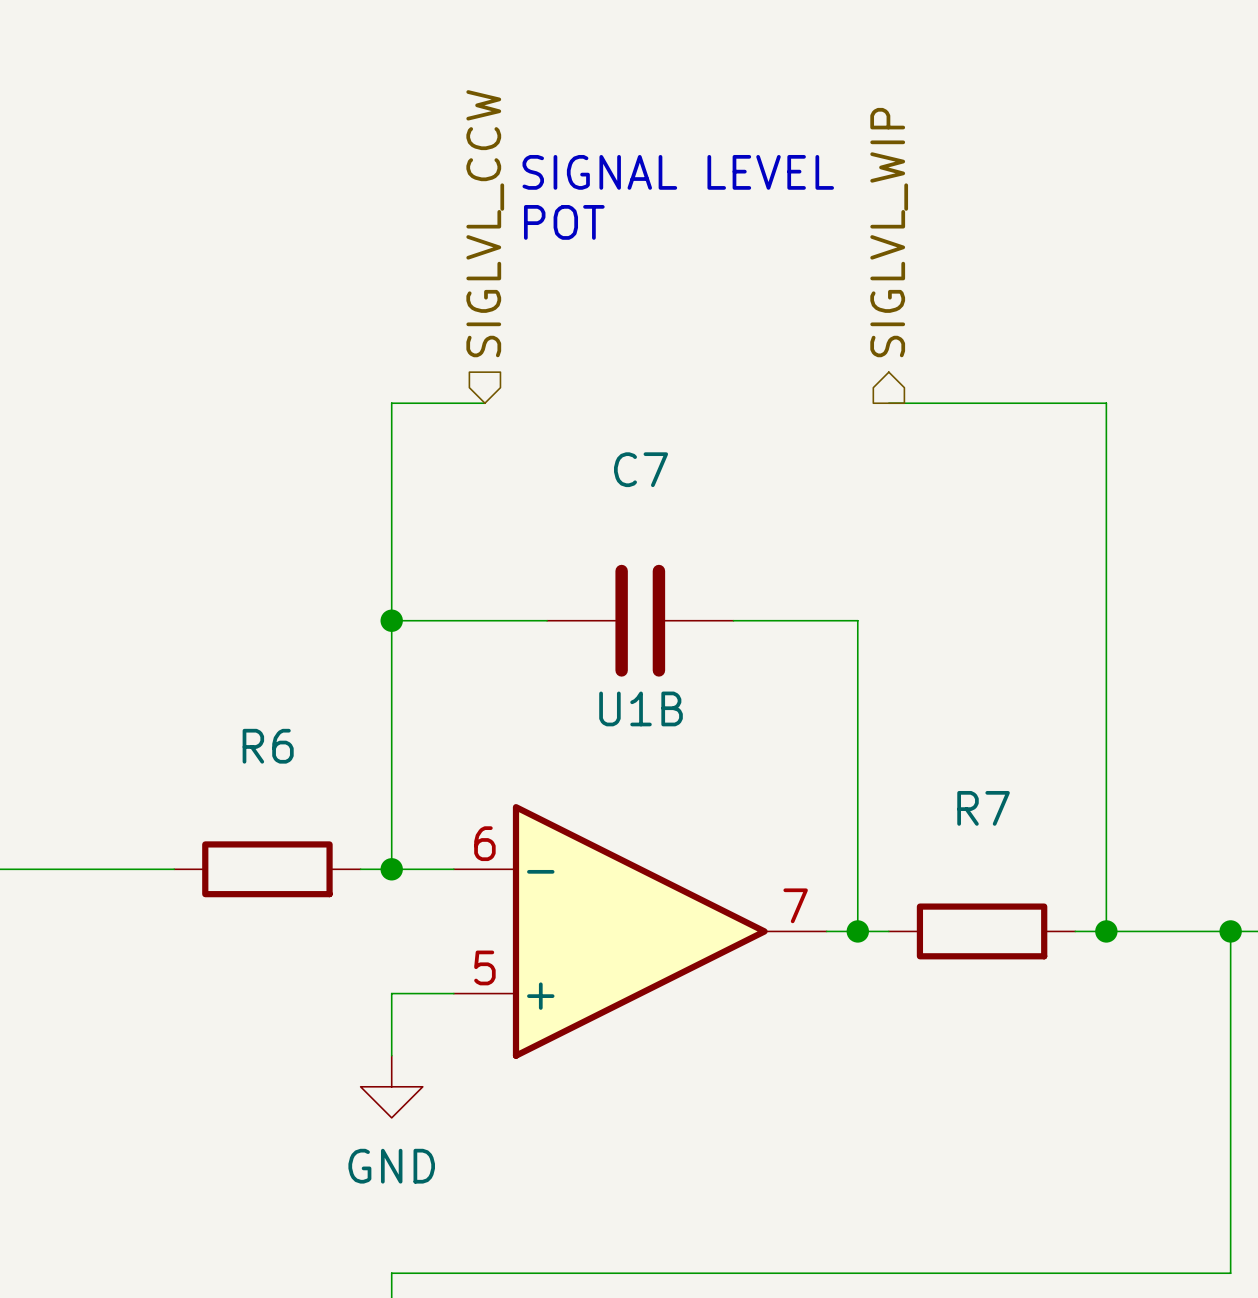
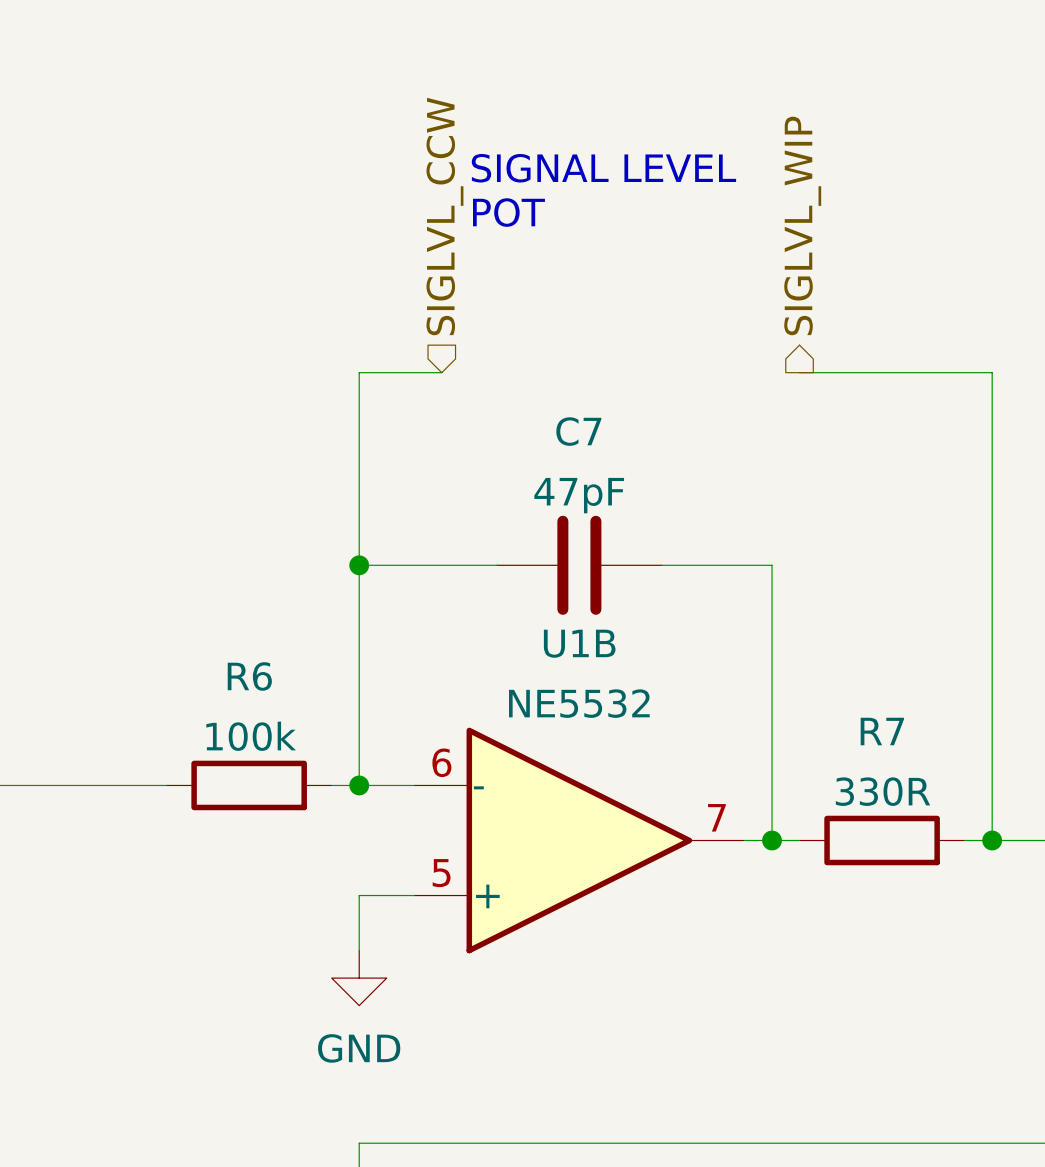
C7 value: none -> 47pF (579, 495)
U1B value: none -> NE5532 (579, 703)
R6 value: none -> 100k (251, 736)
R7 value: none -> 330R (882, 791)

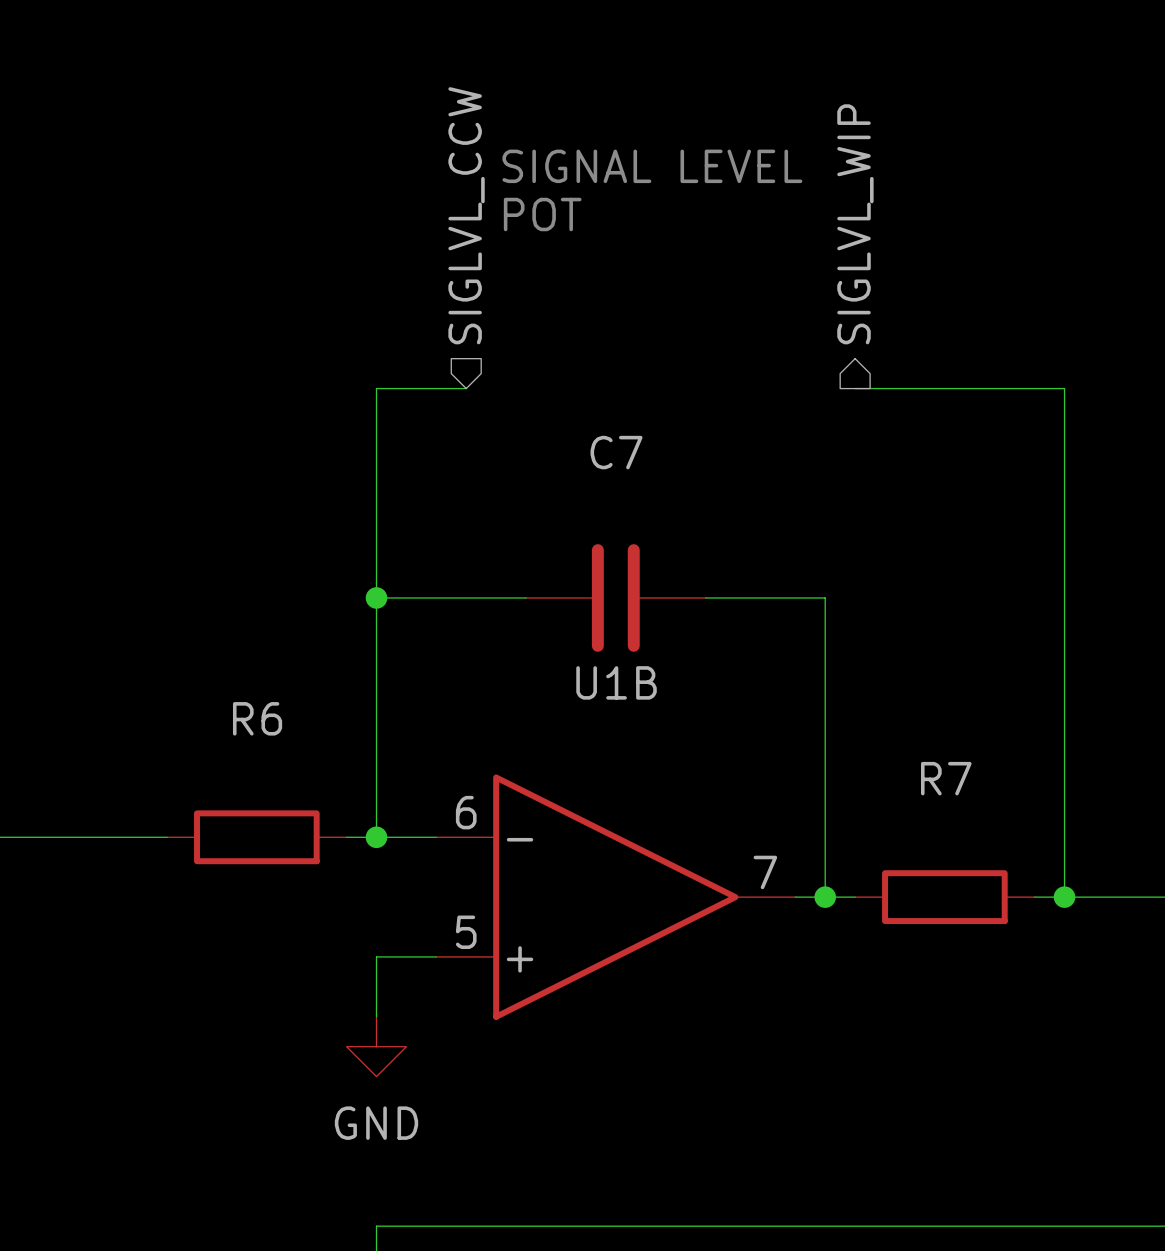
C7 value: 47pF (579, 495) -> none
U1B value: NE5532 (579, 703) -> none
R6 value: 100k (251, 736) -> none
R7 value: 330R (882, 791) -> none

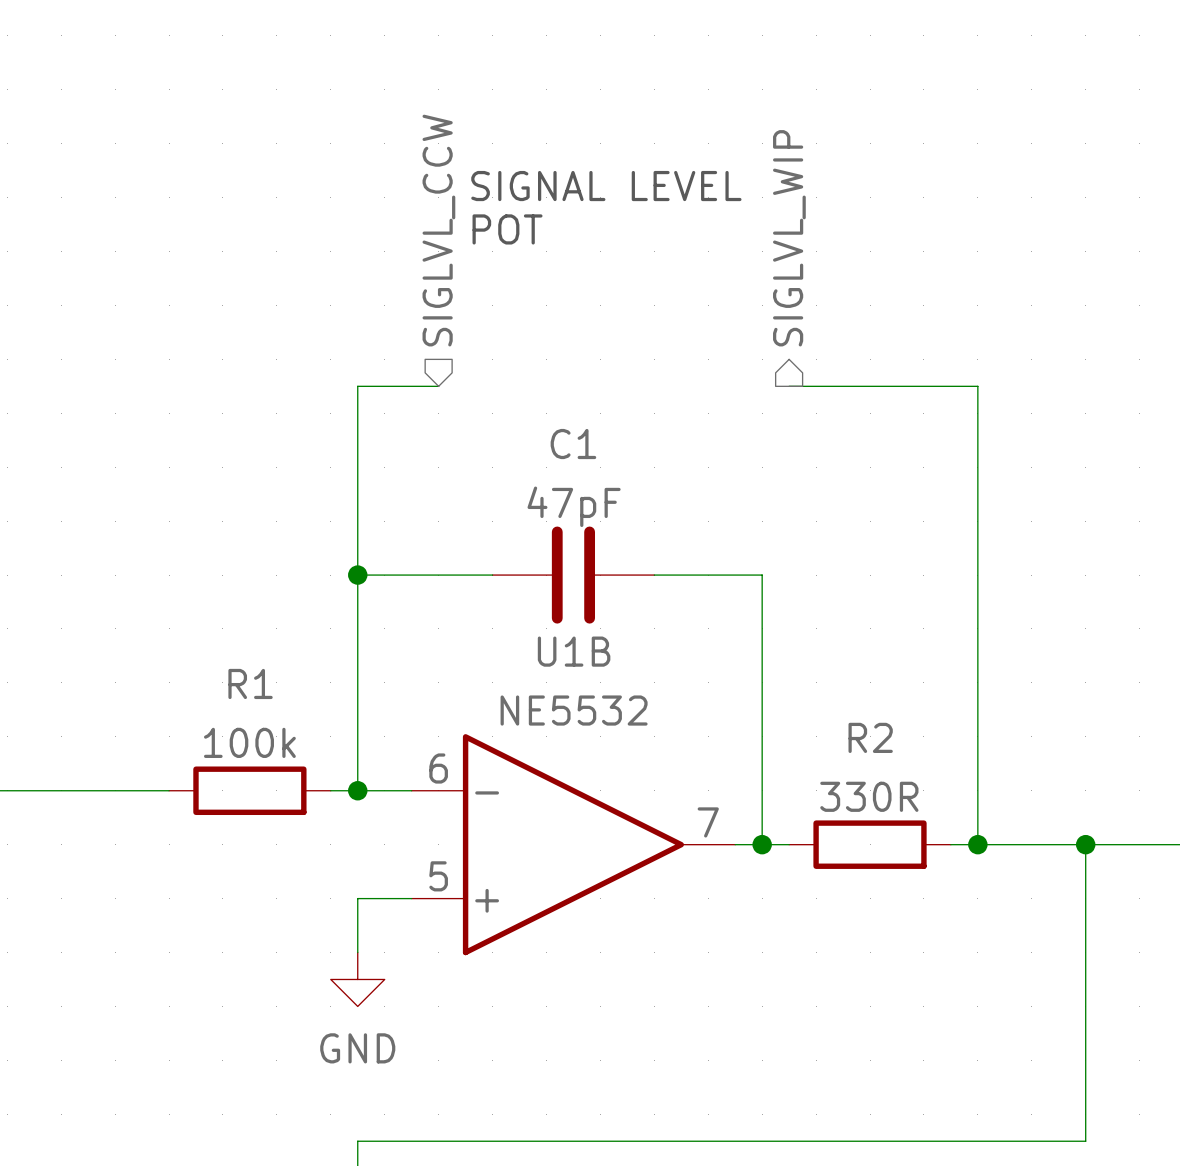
C7 name: C7 (616, 452) -> C1 (573, 444)
C7 value: none -> 47pF (574, 506)
R6 name: R6 (257, 718) -> R1 (250, 683)
U1B value: none -> NE5532 (574, 710)
R7 name: R7 (946, 778) -> R2 (870, 737)
R6 value: none -> 100k (249, 742)
R7 value: none -> 330R (869, 796)

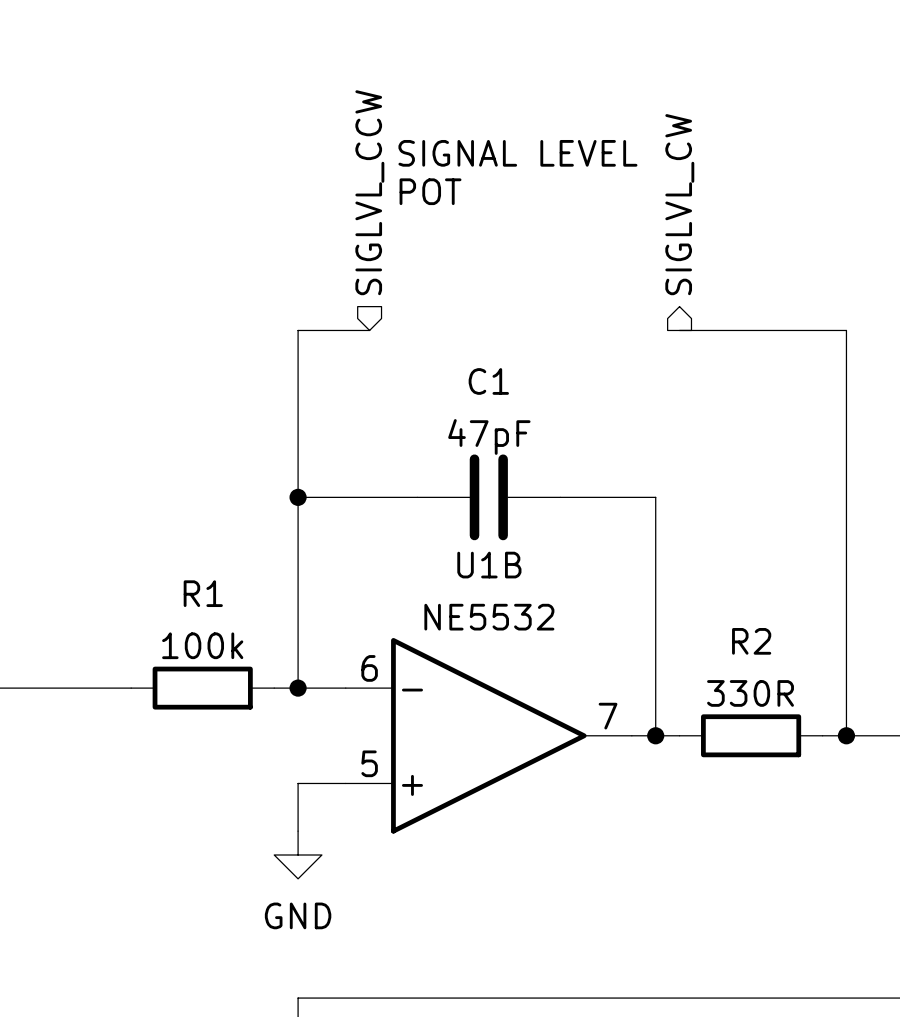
hierarchical label: SIGLVL_WIP (789, 238) -> SIGLVL_CW (679, 204)

